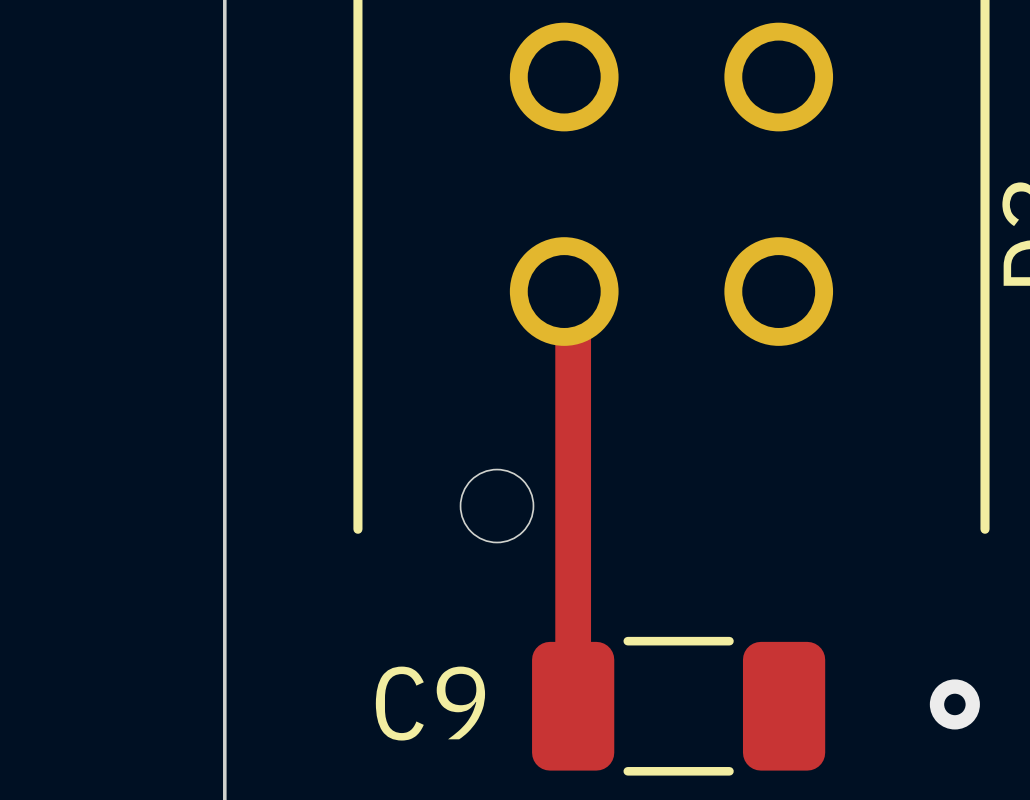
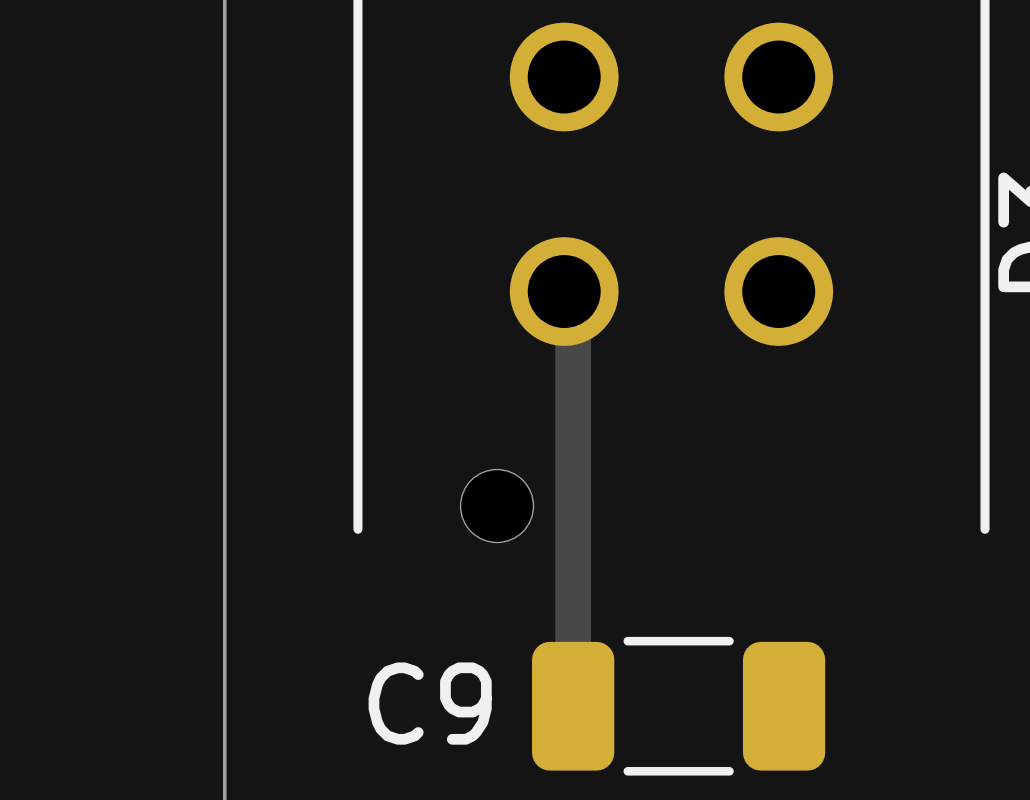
via: (954, 704) -> none

